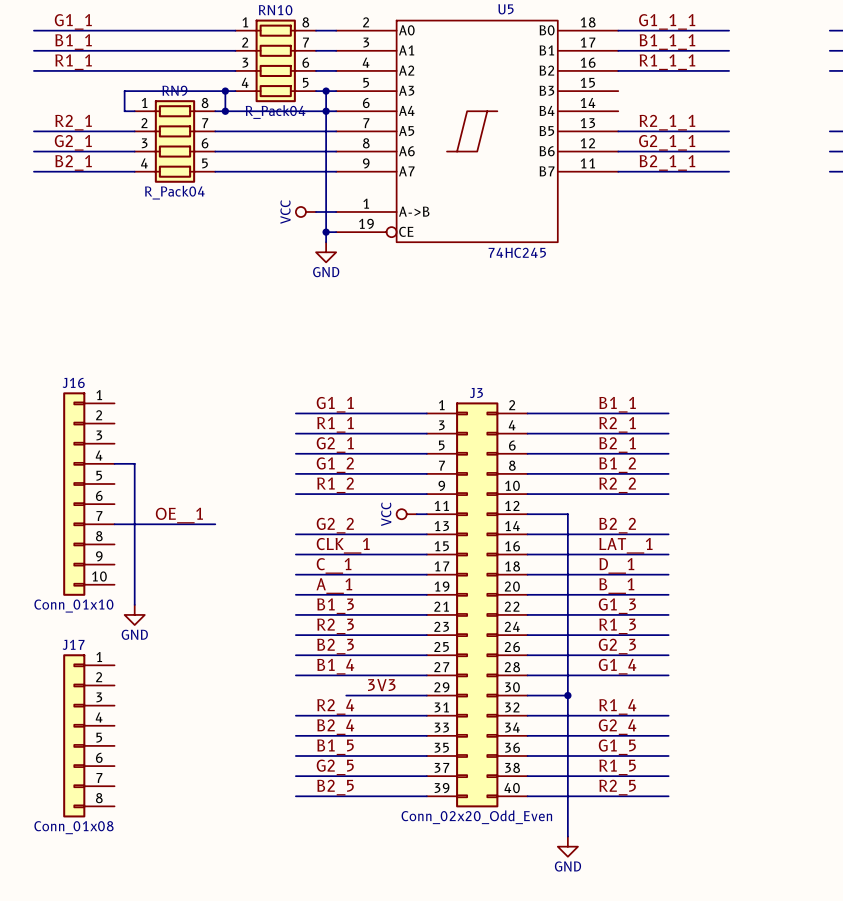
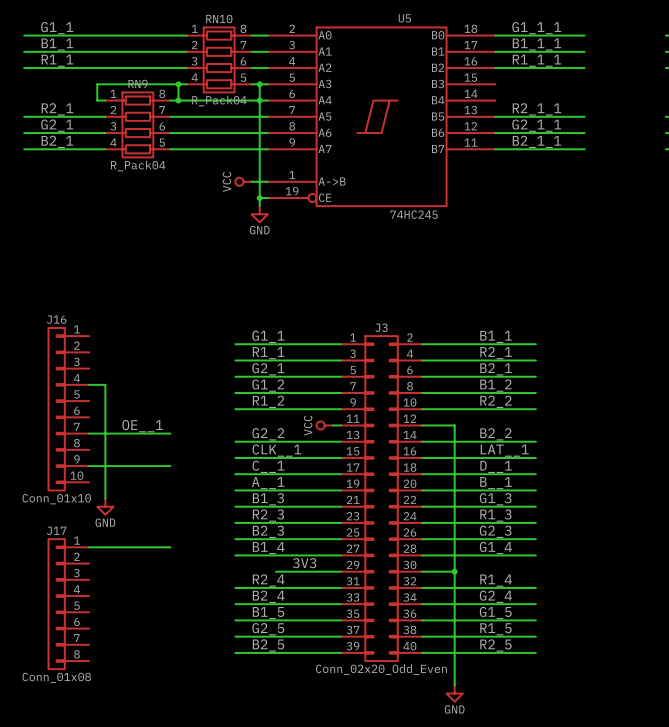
wire: none -> (89, 466) (170, 466)
wire: none -> (89, 547) (170, 547)

